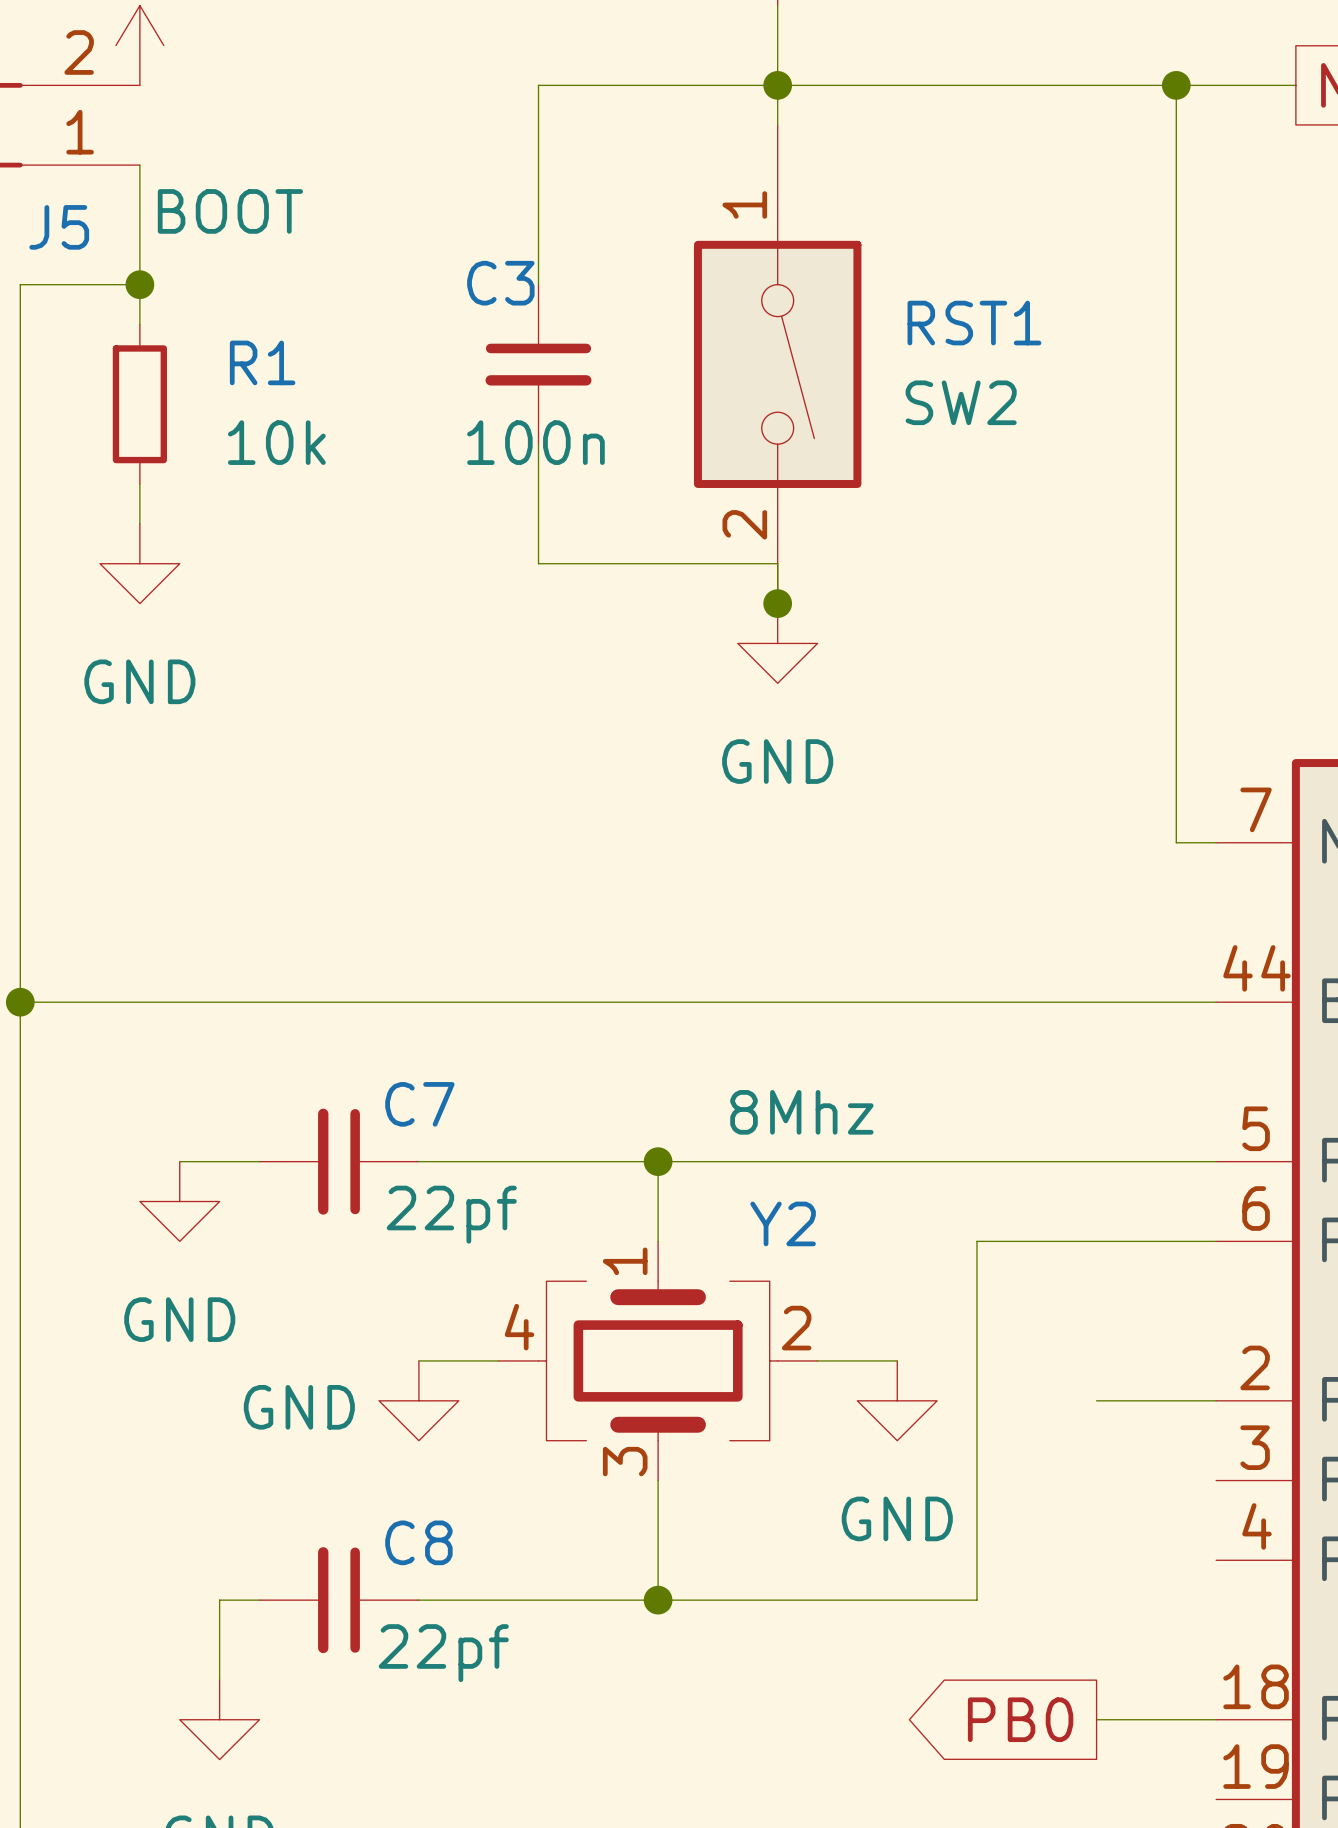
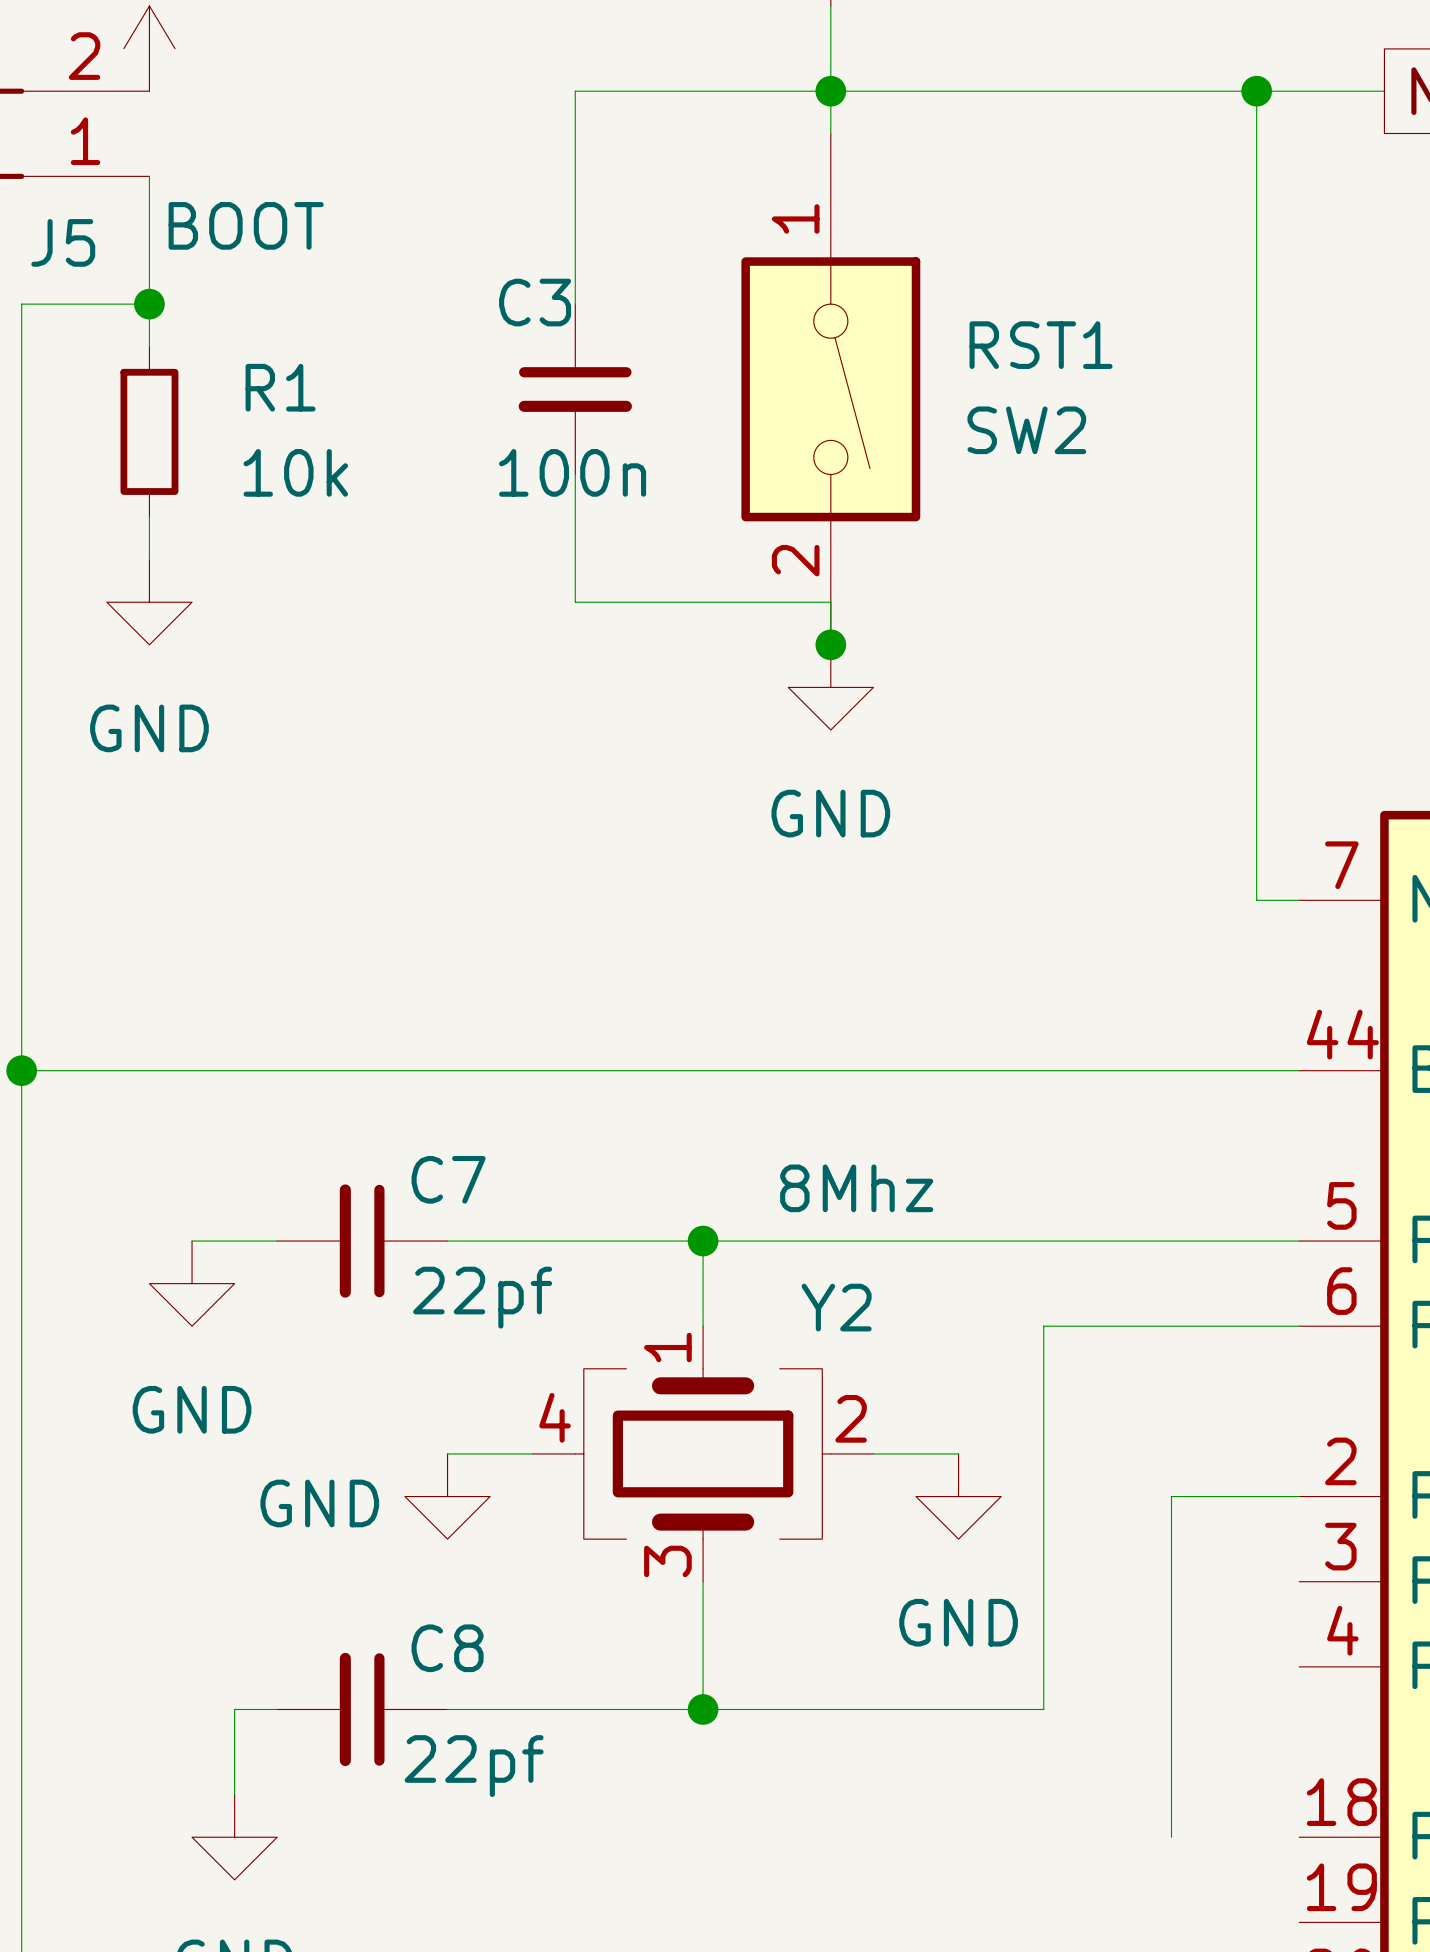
global label: PB0 (1020, 1719) -> none
wire: (1096, 1719) (1216, 1719) -> (1171, 1837) (1171, 1496)

